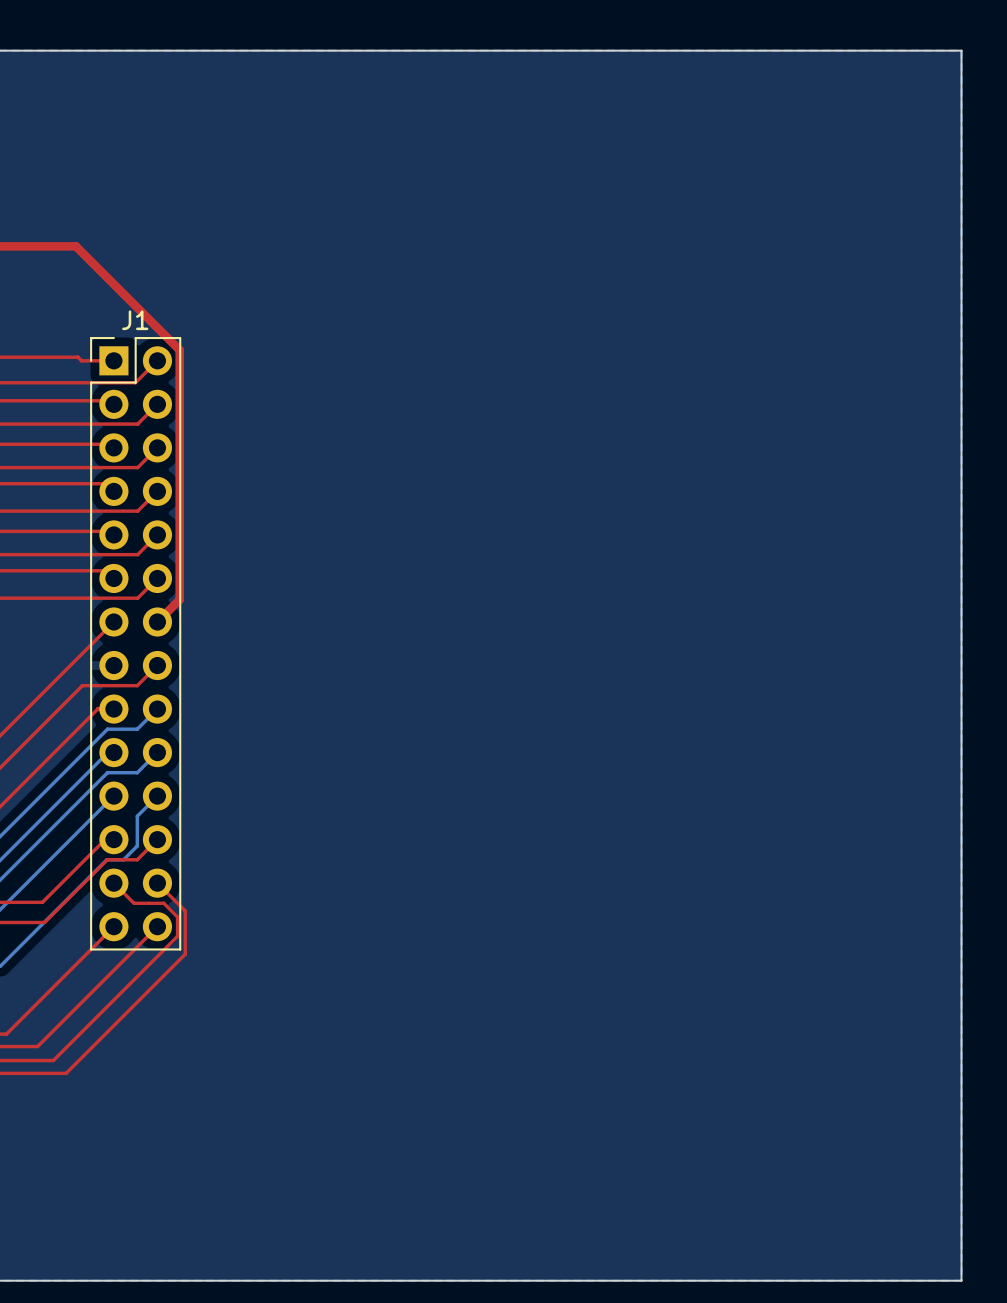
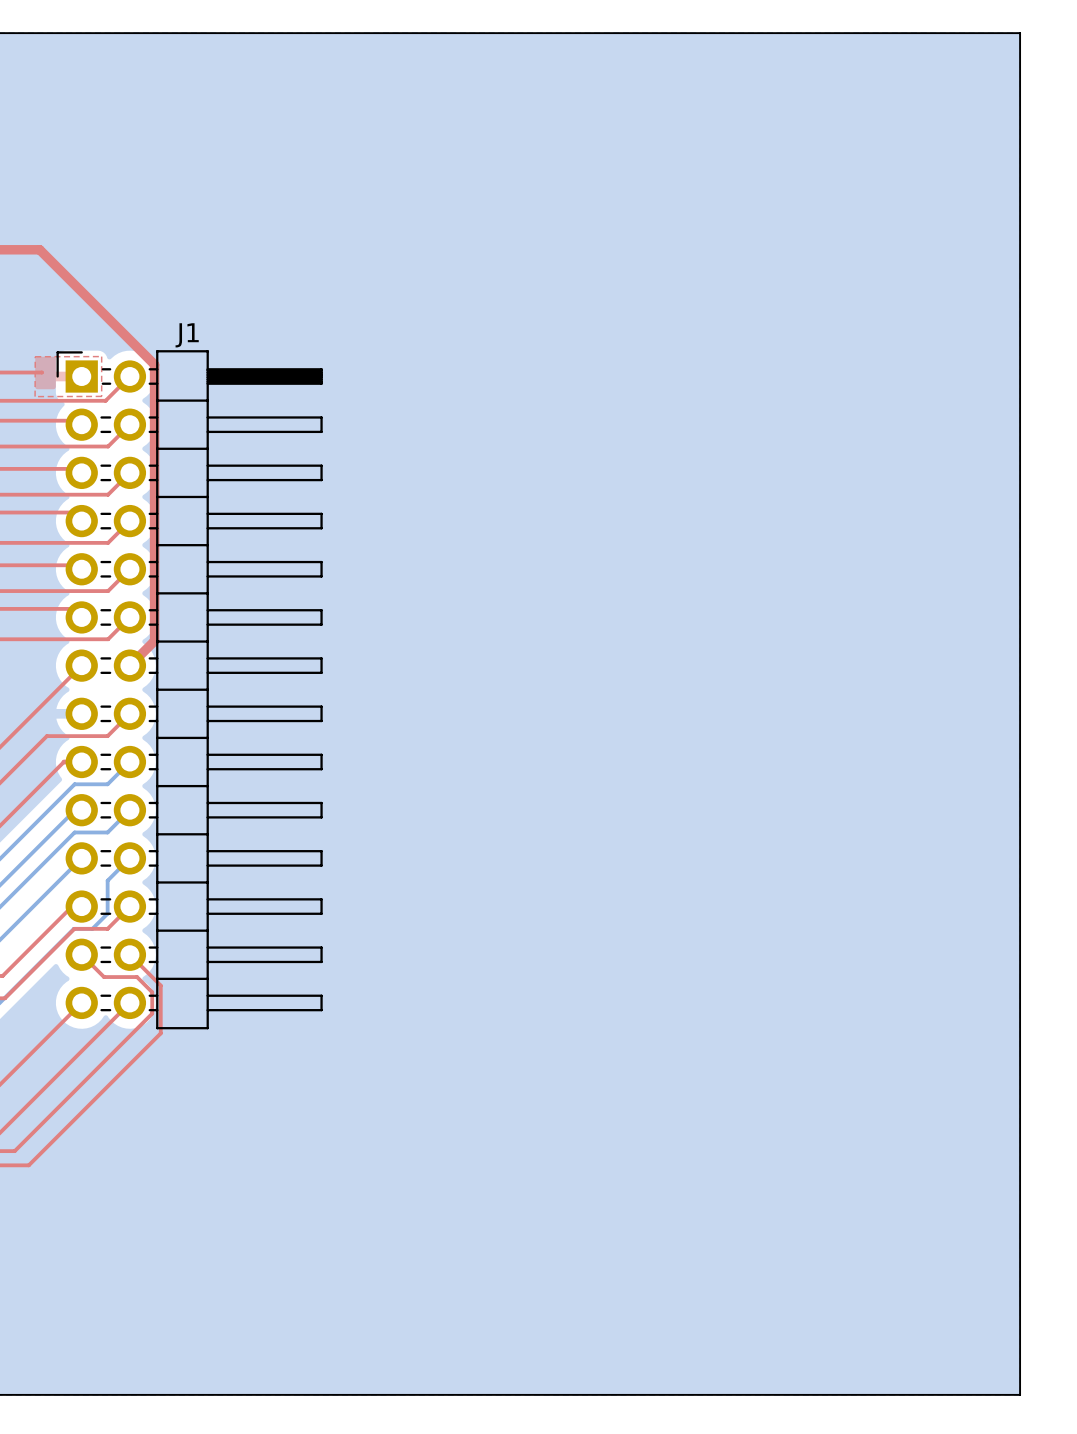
J1 footprint: [90, 337, 182, 951] -> [56, 350, 323, 1030]
top zone outline: none -> (101, 356) (35, 356) (35, 396) (101, 396) (101, 356)
top track: (77, 357) (81, 360) (113, 360) -> none

